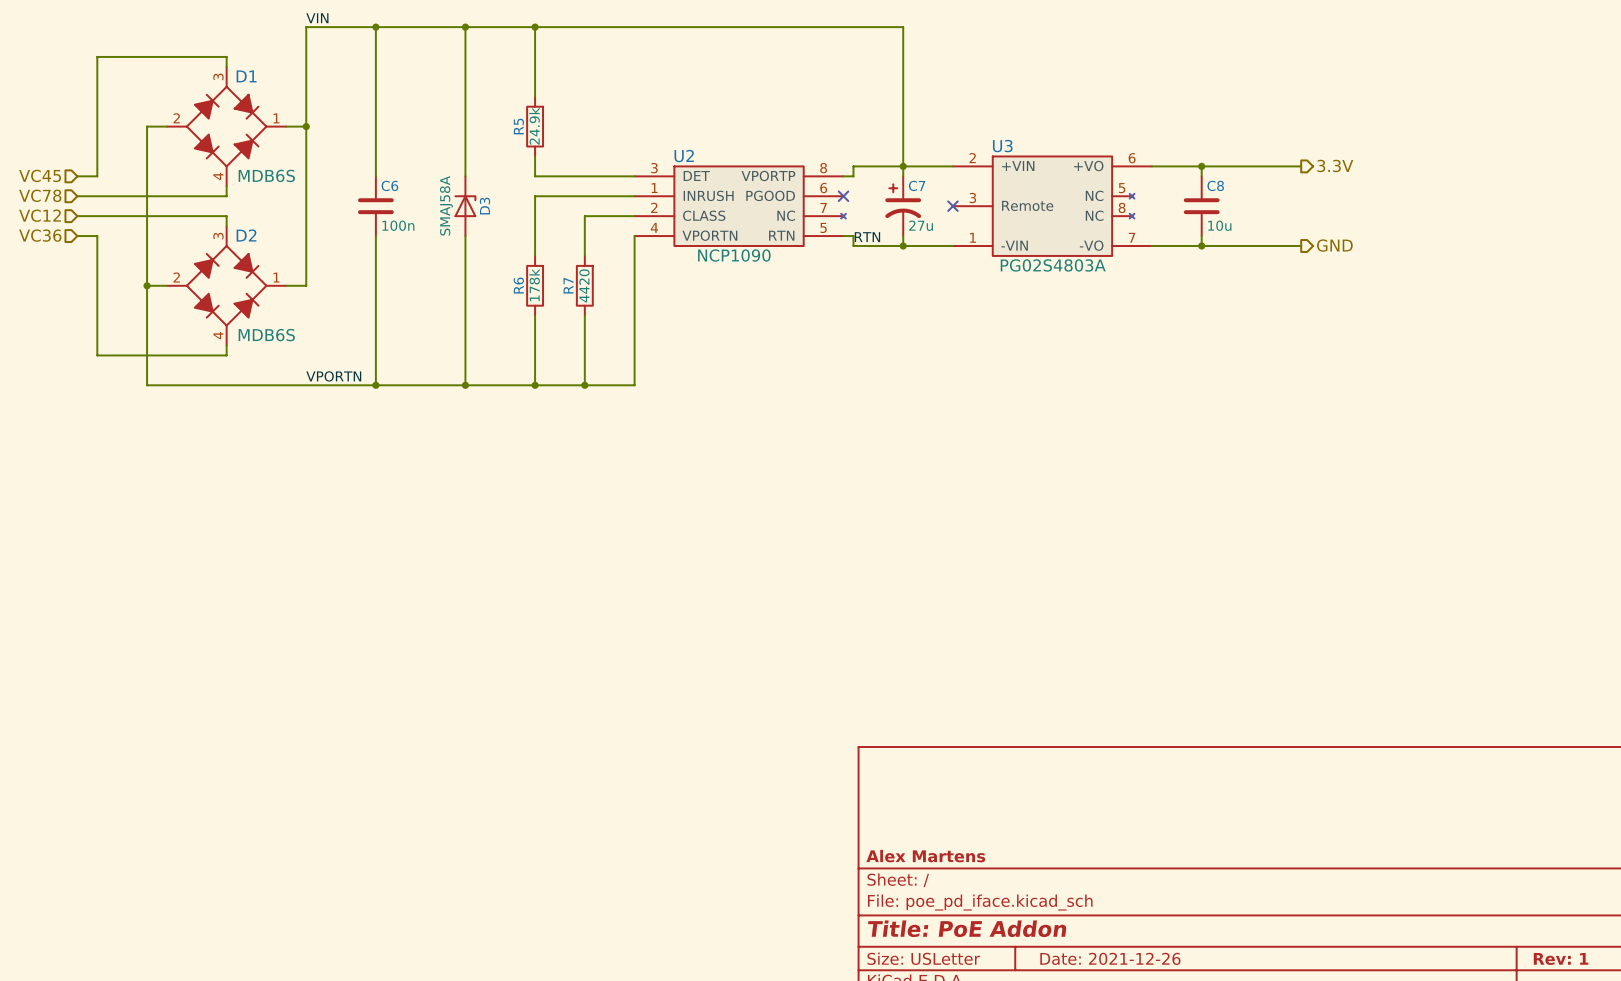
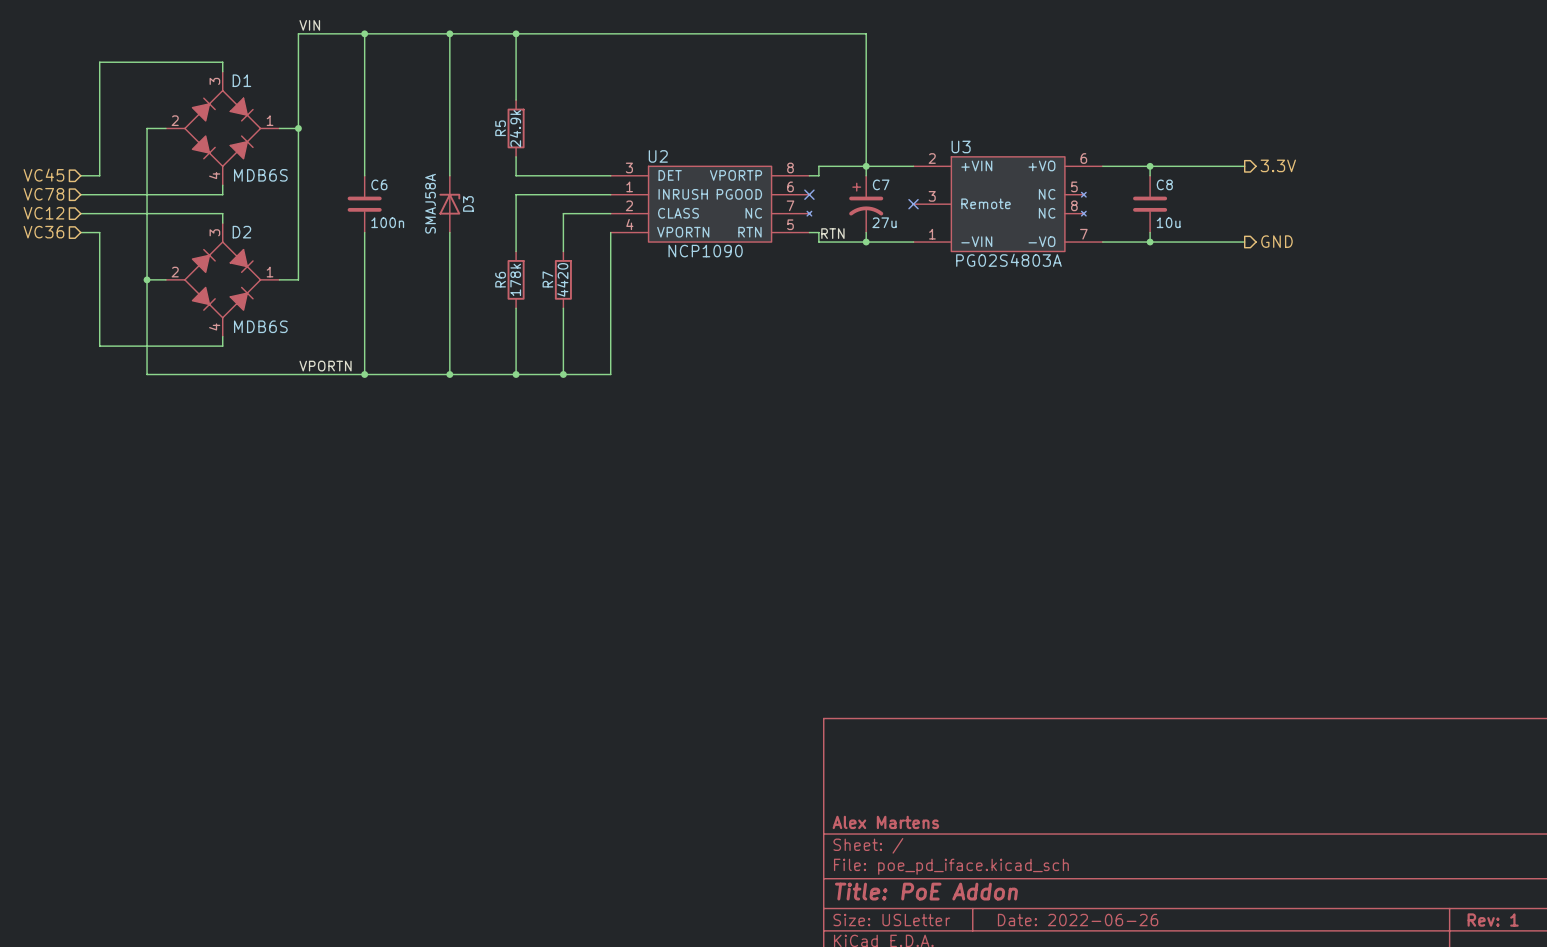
title block: Date: 2021-12-26 (1110, 958) -> Date: 2022-06-26 (1078, 920)

